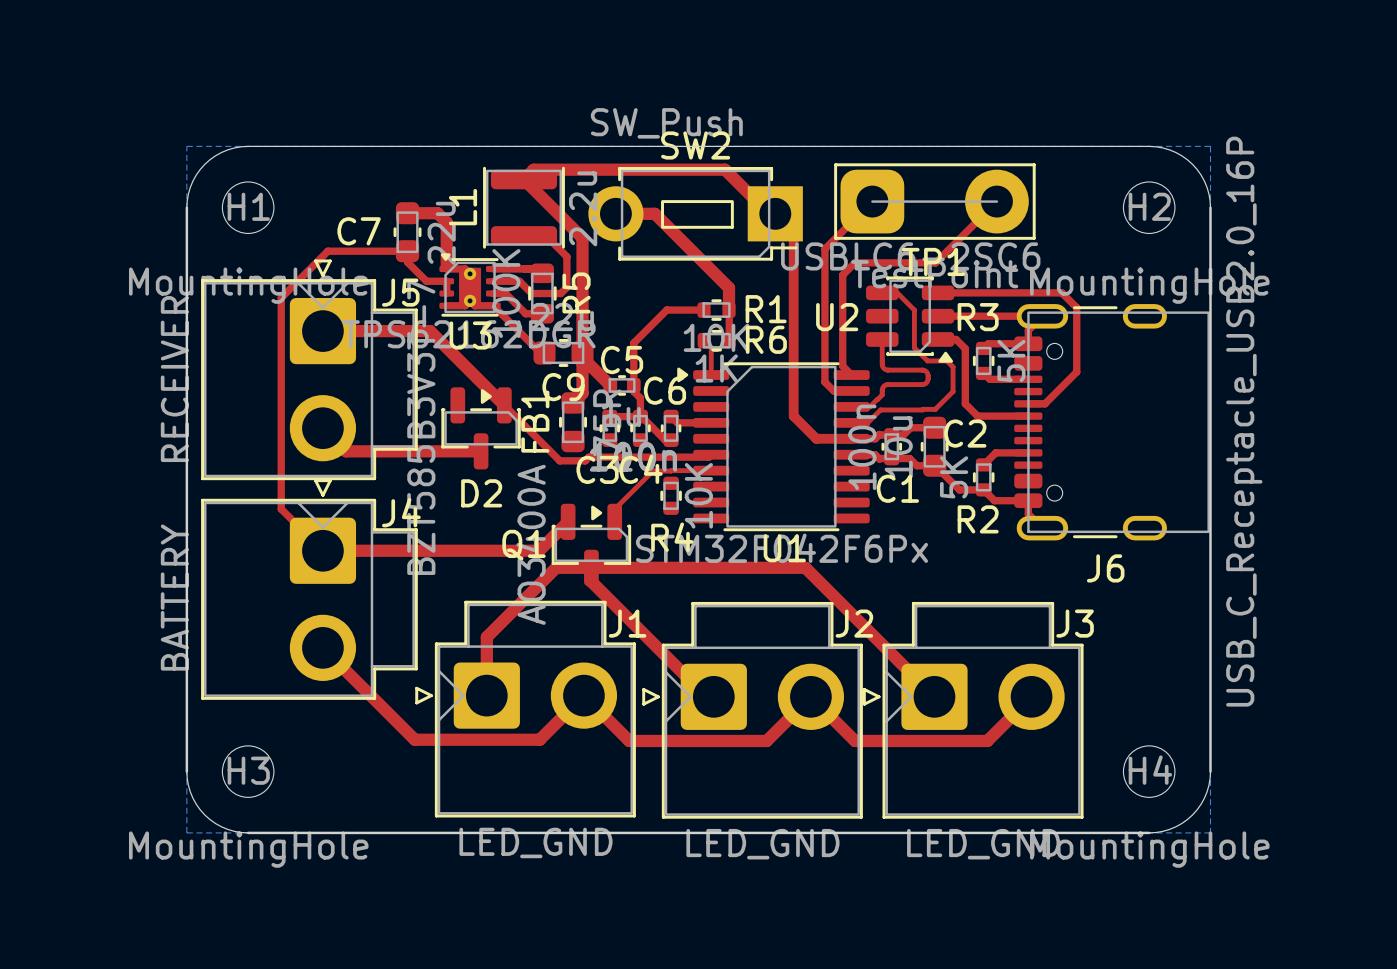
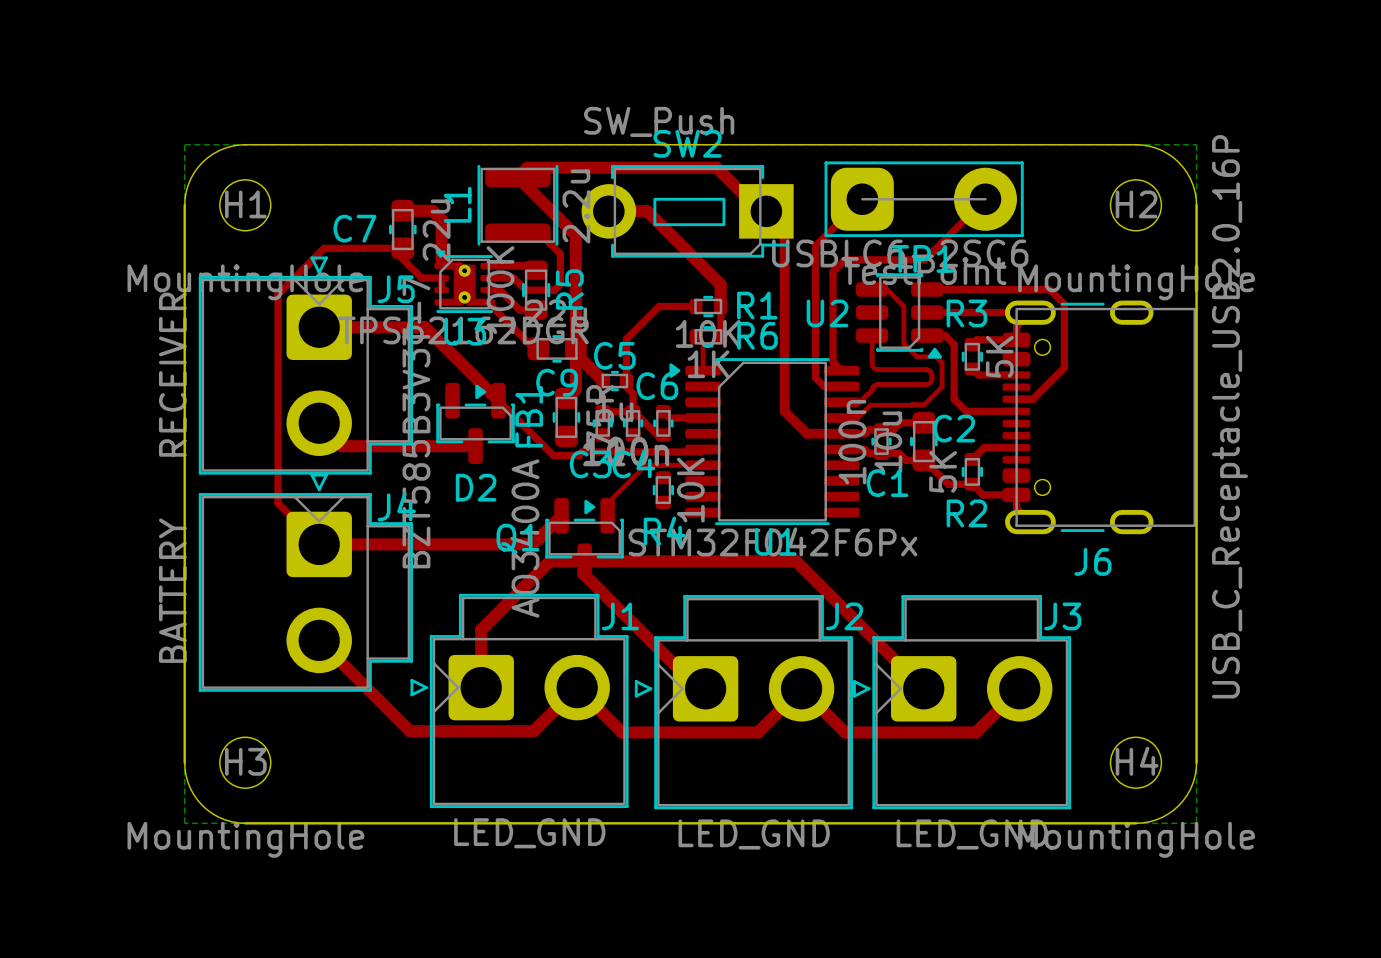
top track: (882, 364) (886, 369) (923, 370) (928, 375) (927, 381) (923, 384) (885, 385) (882, 388) (882, 394) -> (872, 360) (872, 366) (876, 369) (926, 369) (931, 375) (931, 381) (927, 384) (877, 384) (872, 390)

